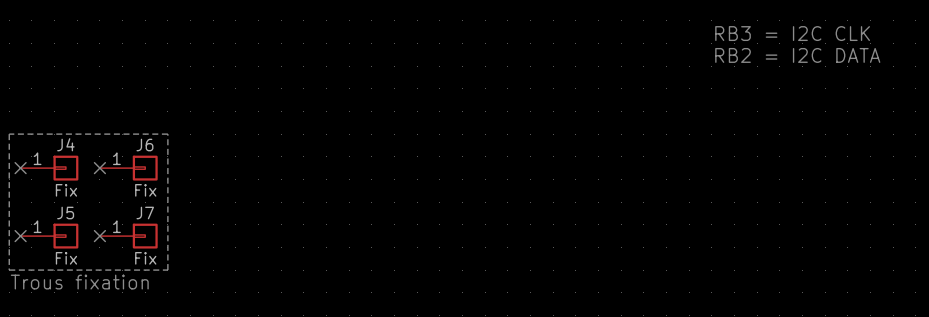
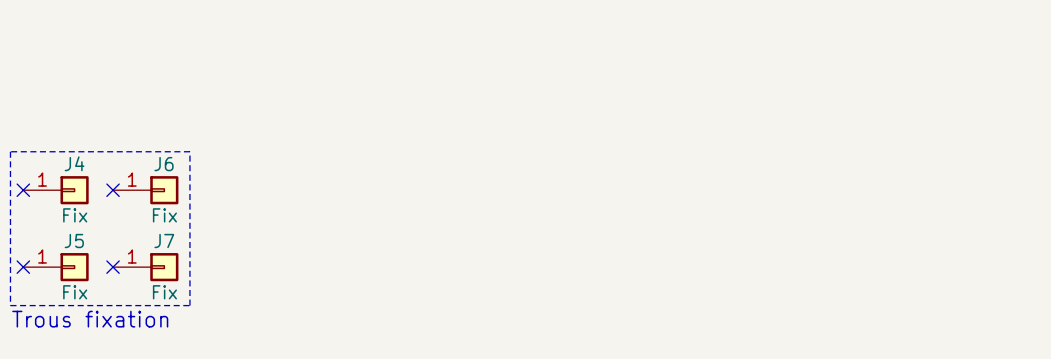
text: RB3 = I2C CLK (792, 33) -> none
text: RB2 = I2C DATA (797, 55) -> none

